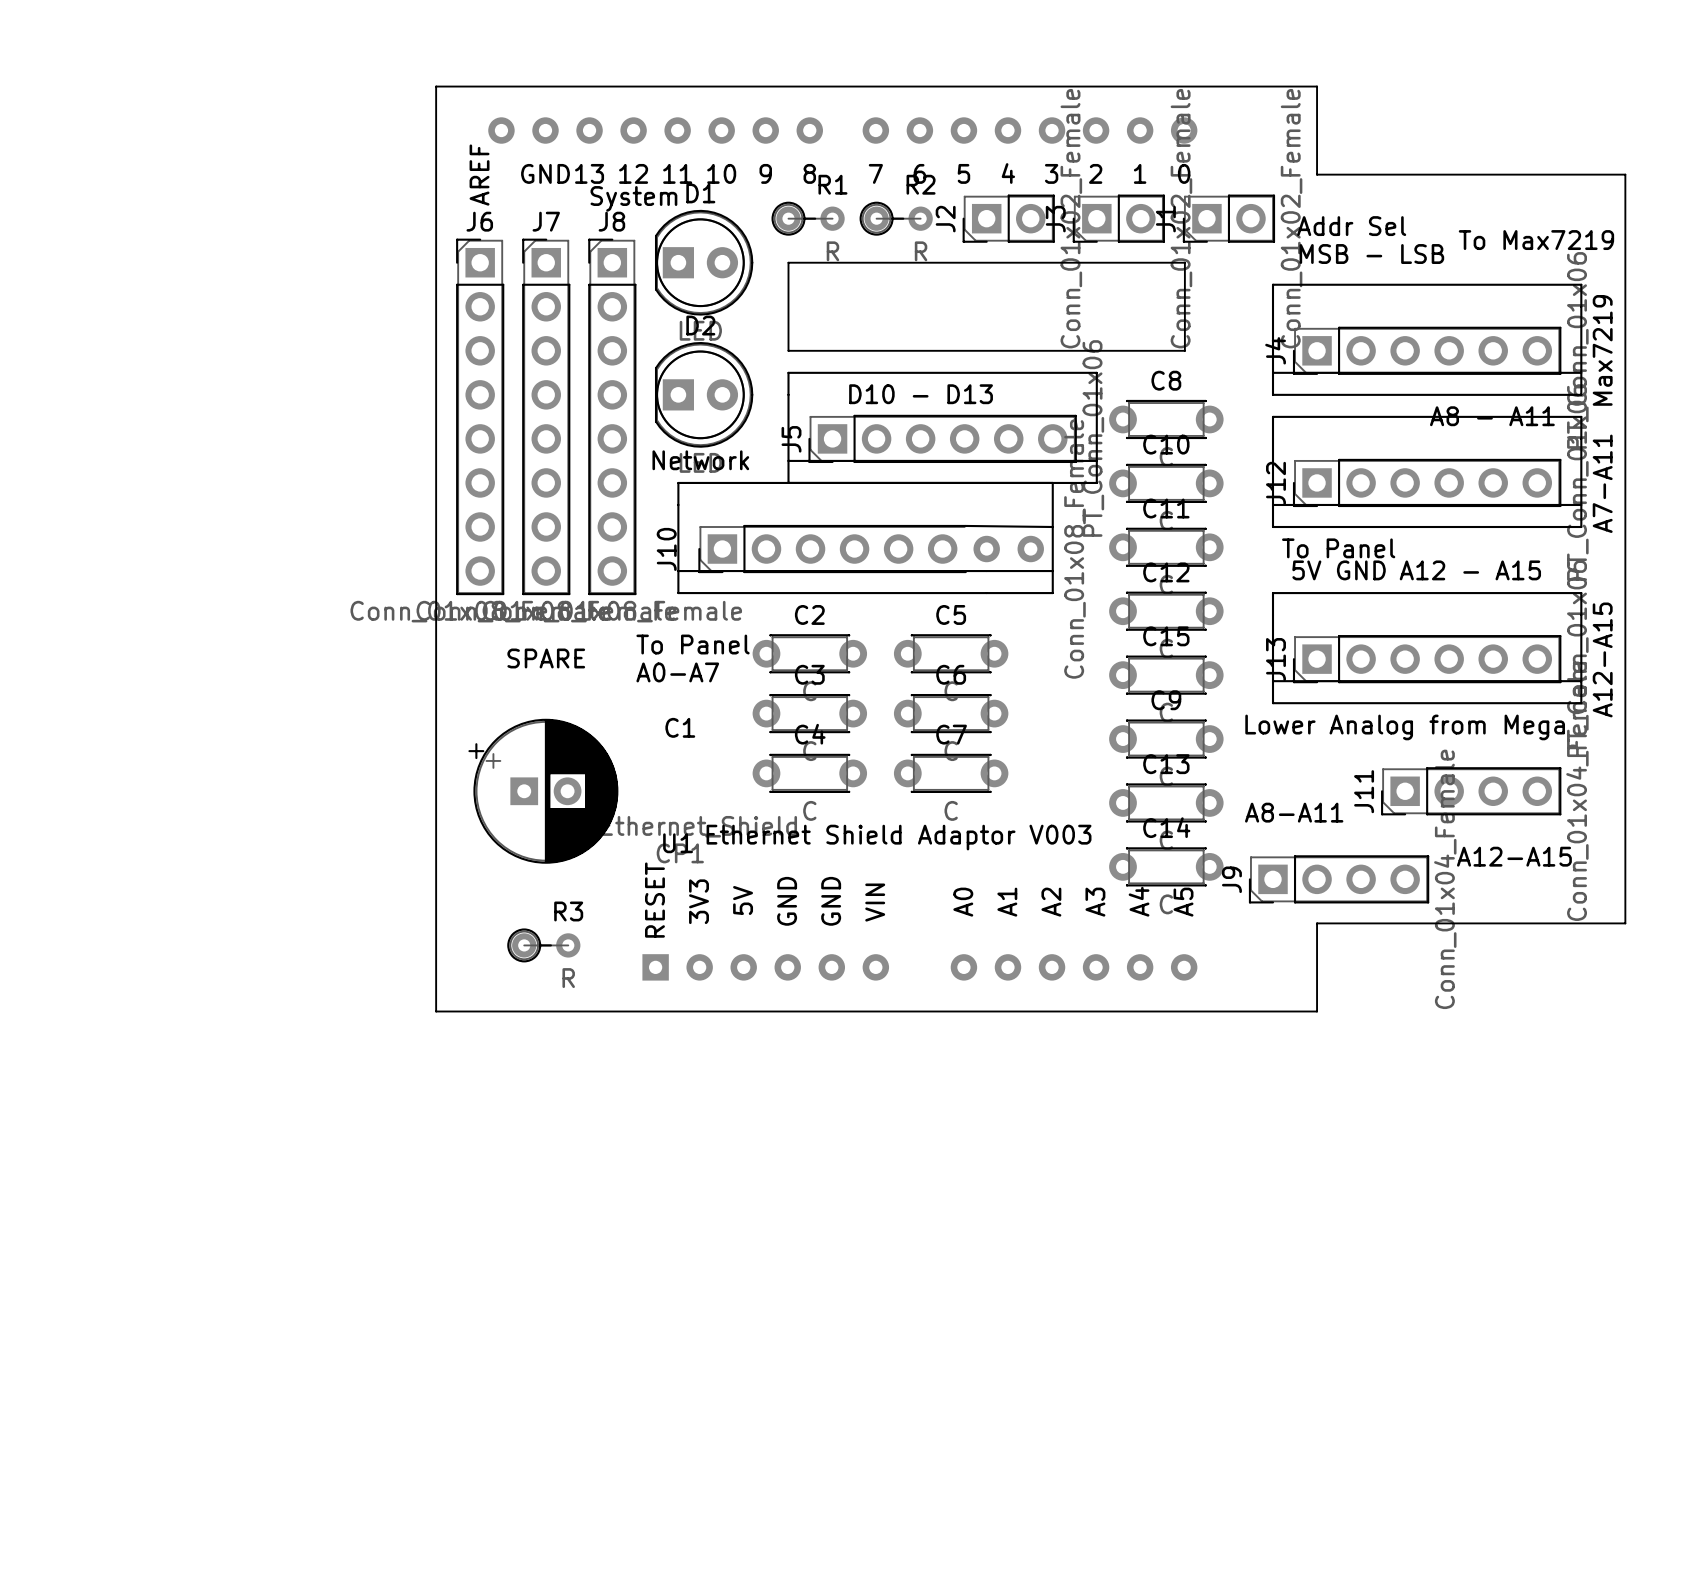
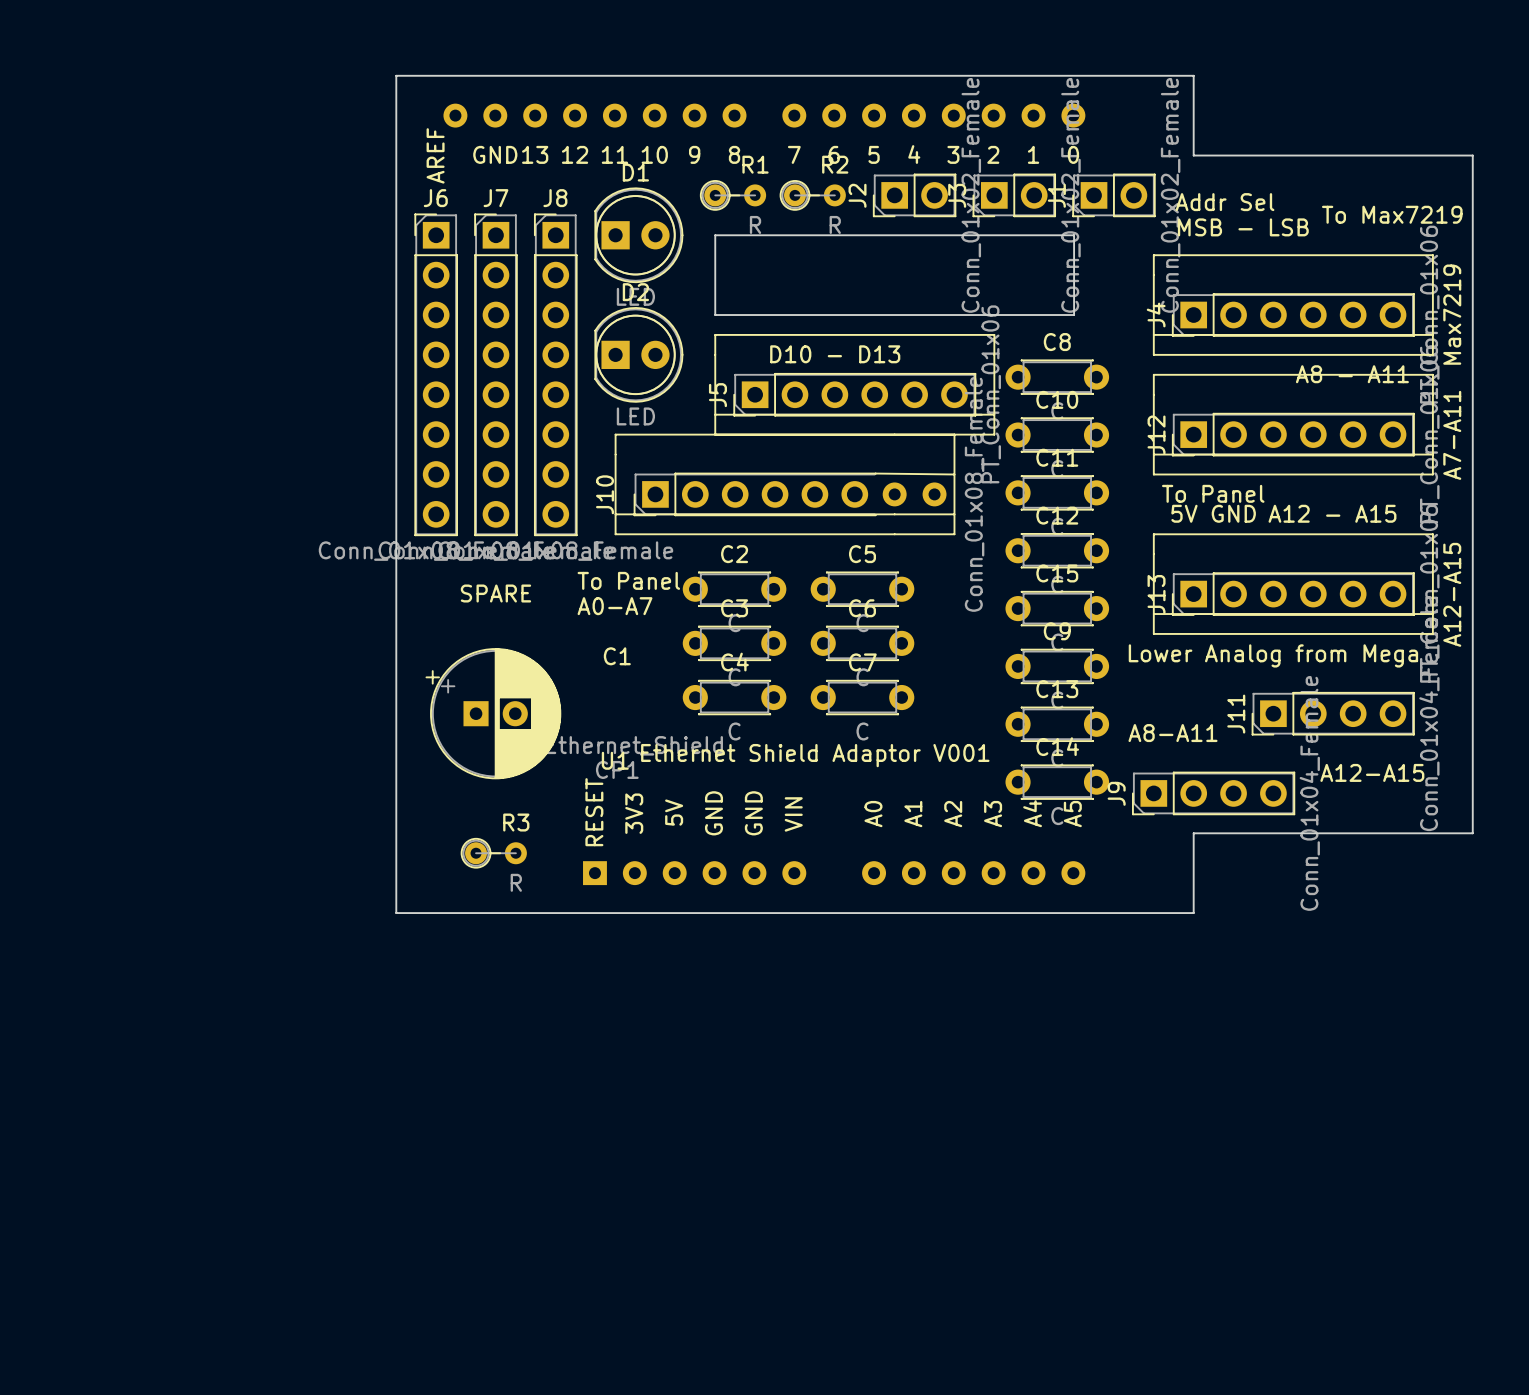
text: System (633, 198) -> none
text: Network (700, 460) -> none
text: Ethernet Shield Adaptor V003 (899, 837) -> Ethernet Shield Adaptor V001 (815, 755)

